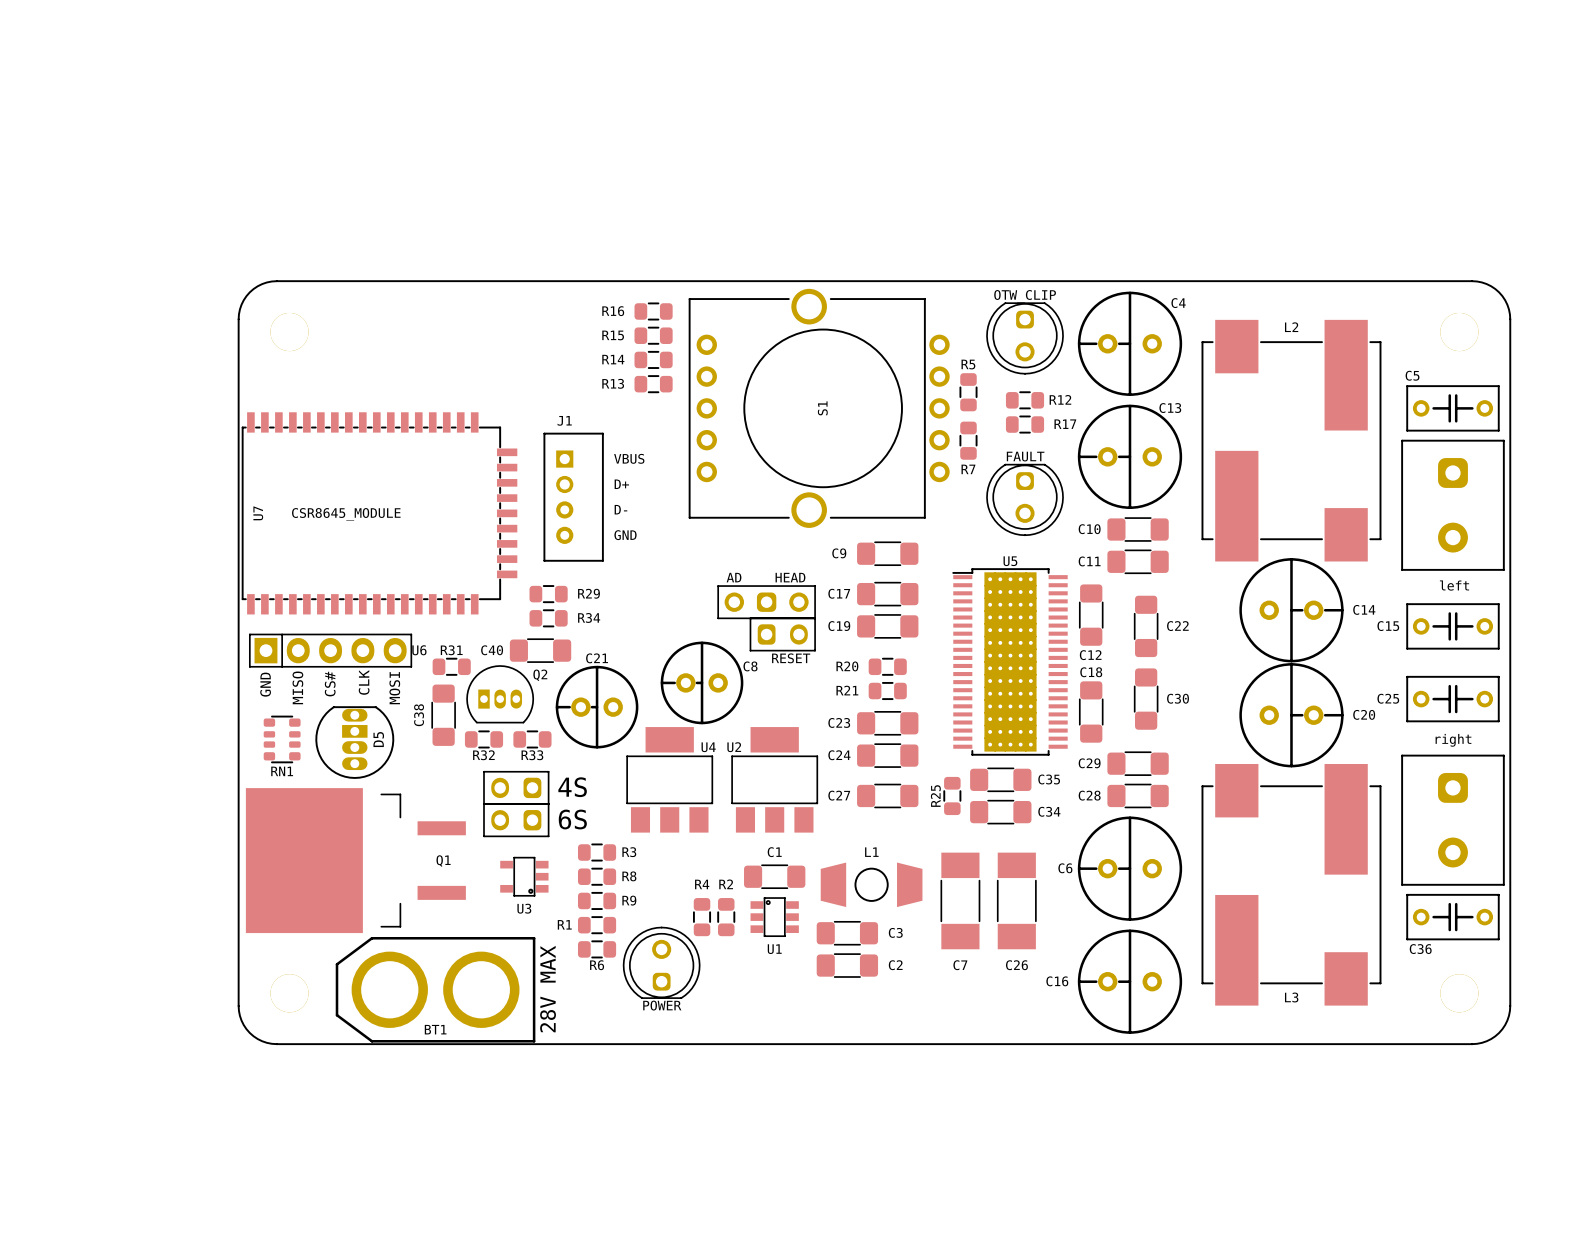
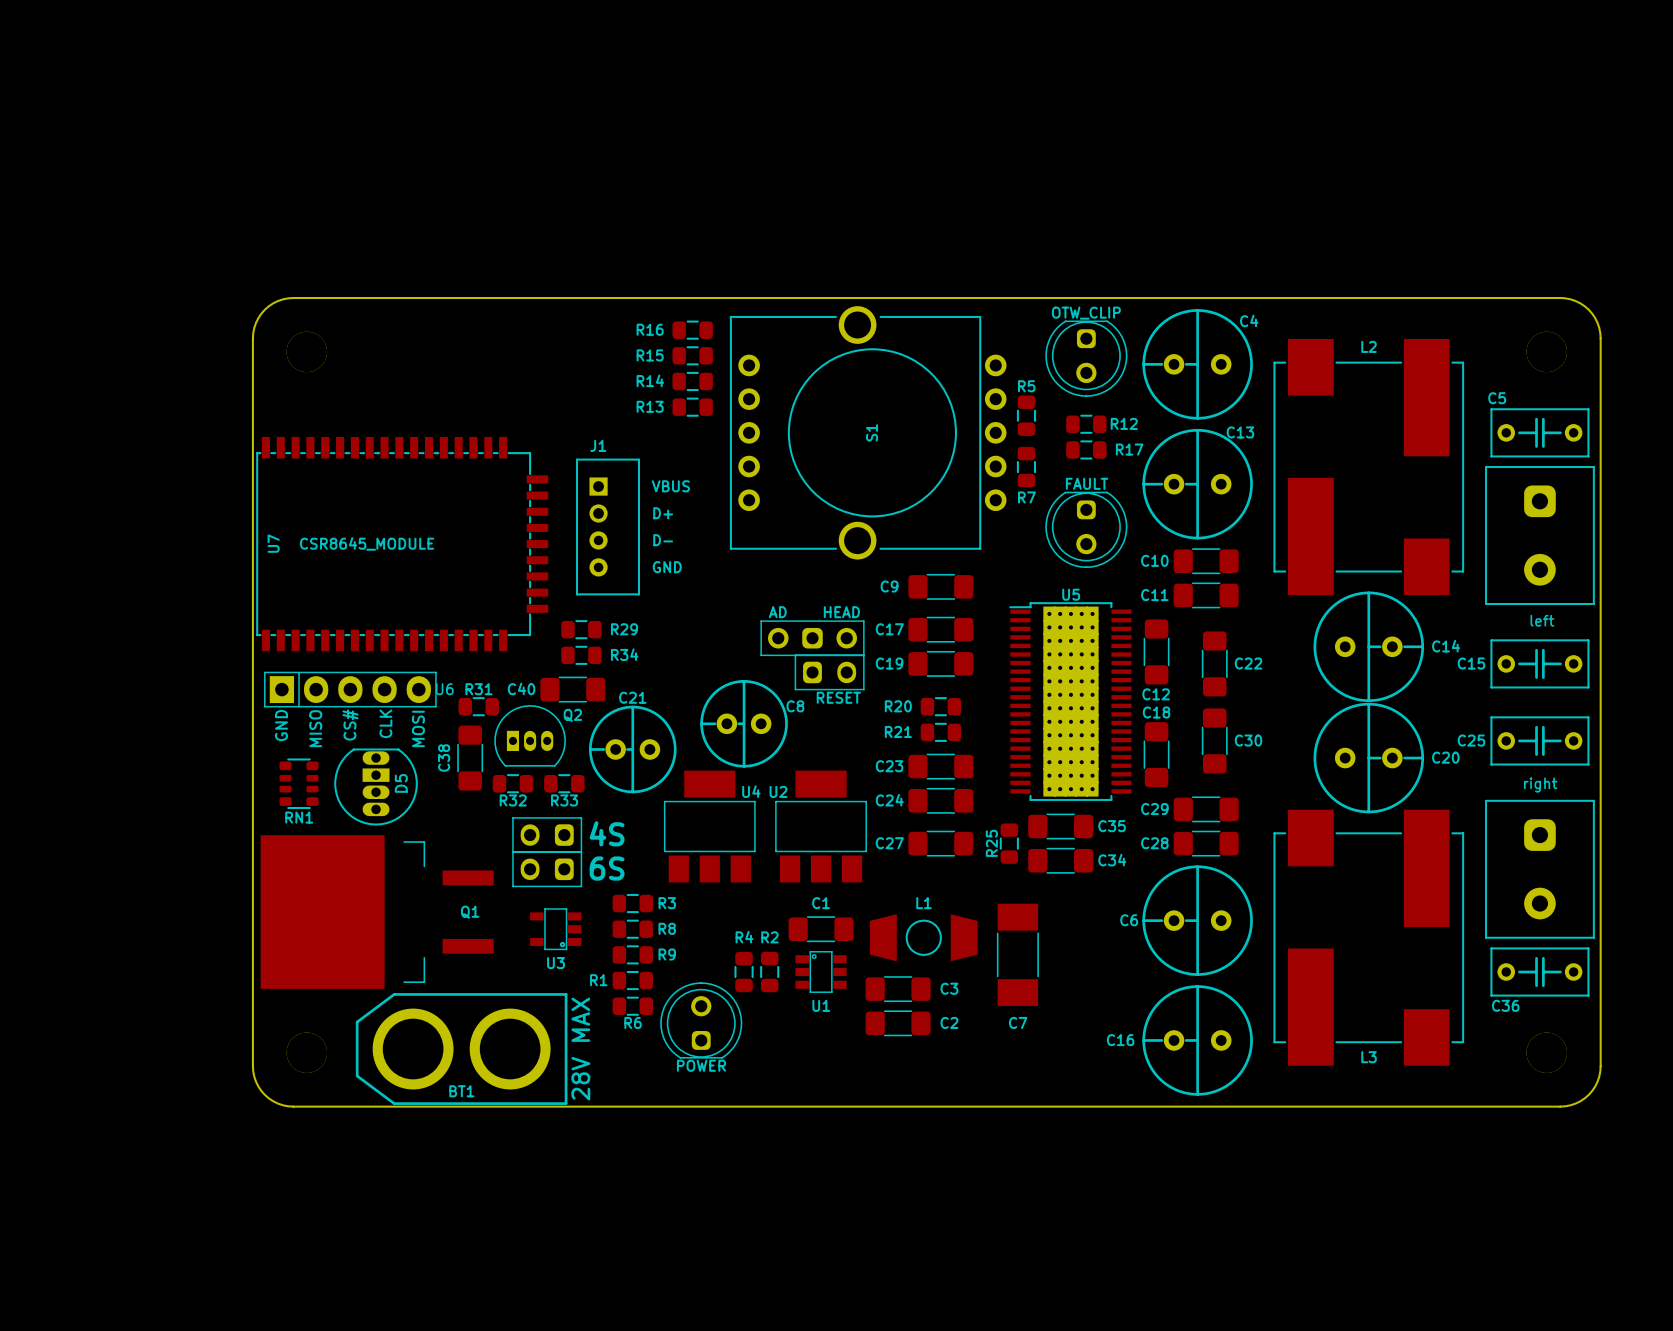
C26: (1016, 900) -> none

